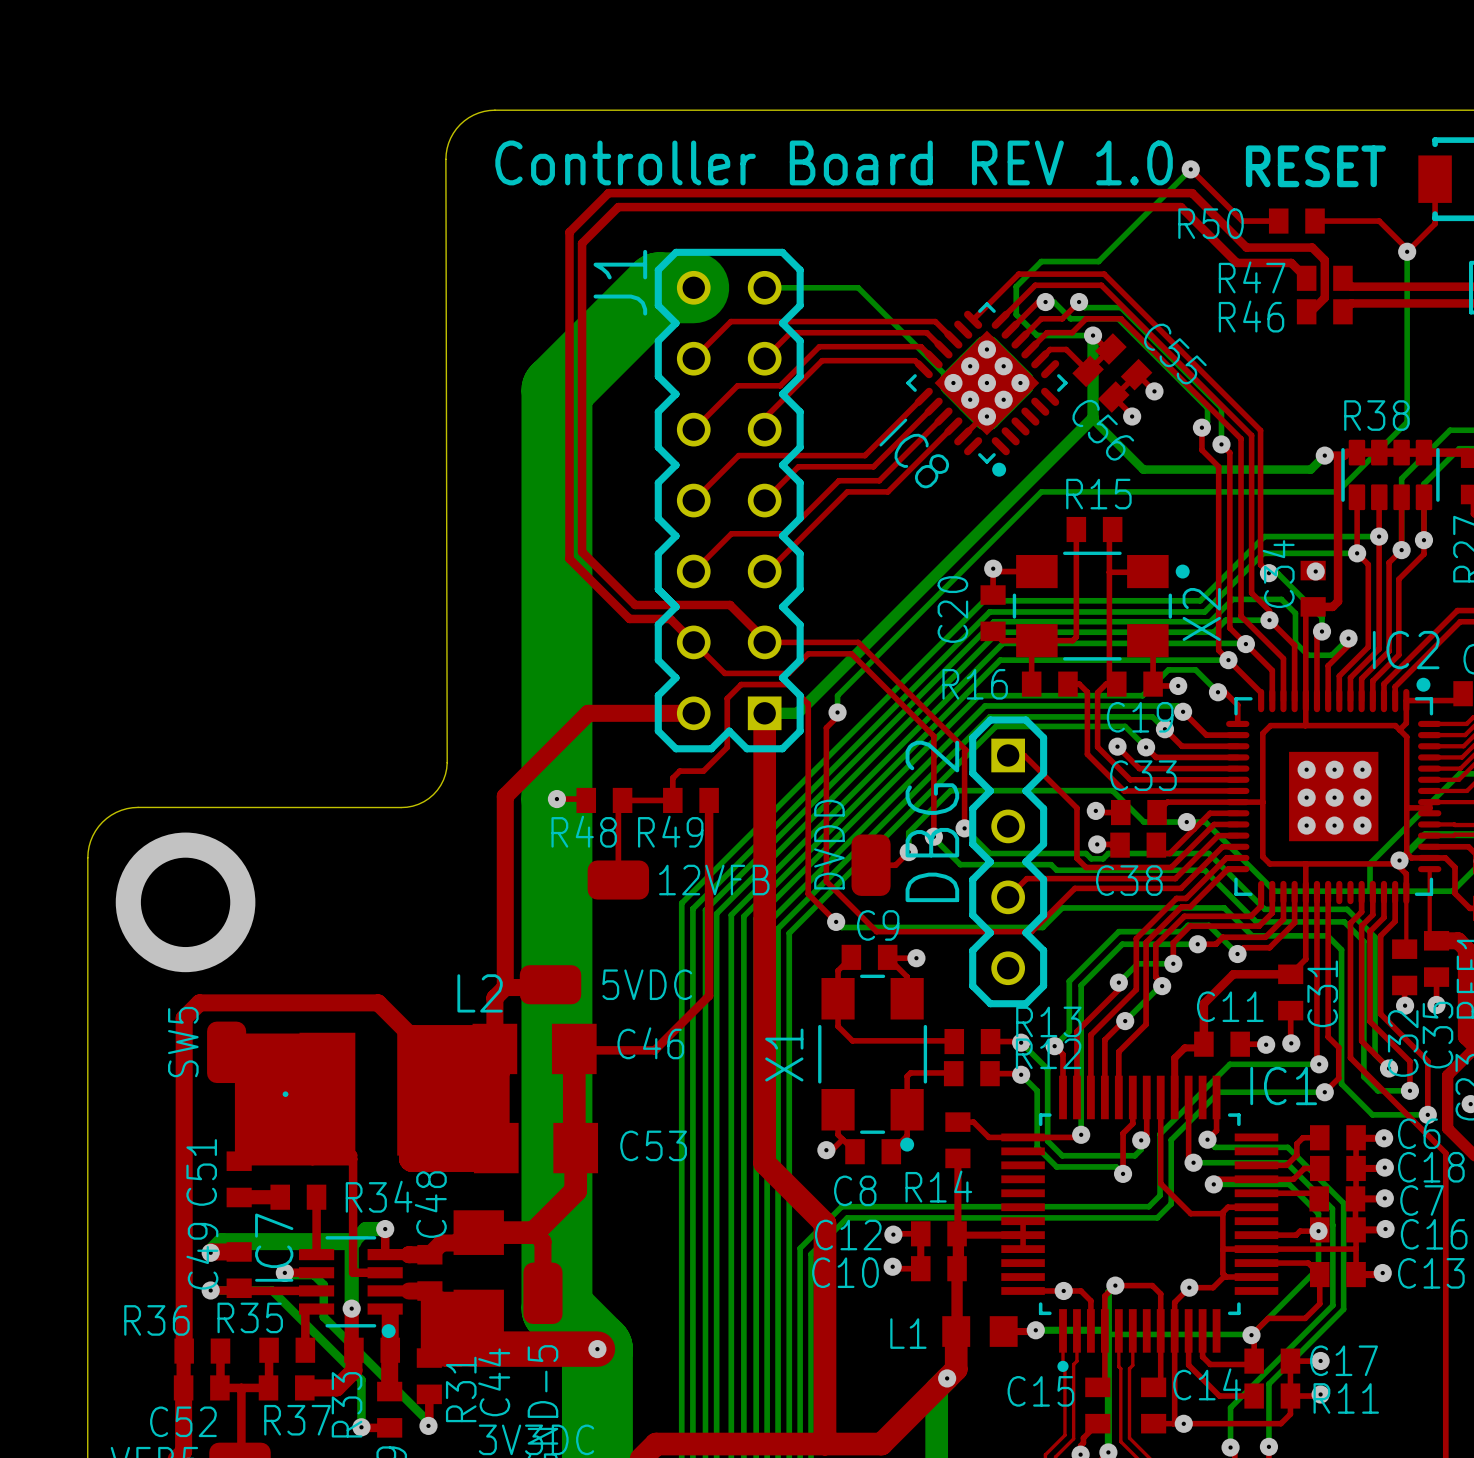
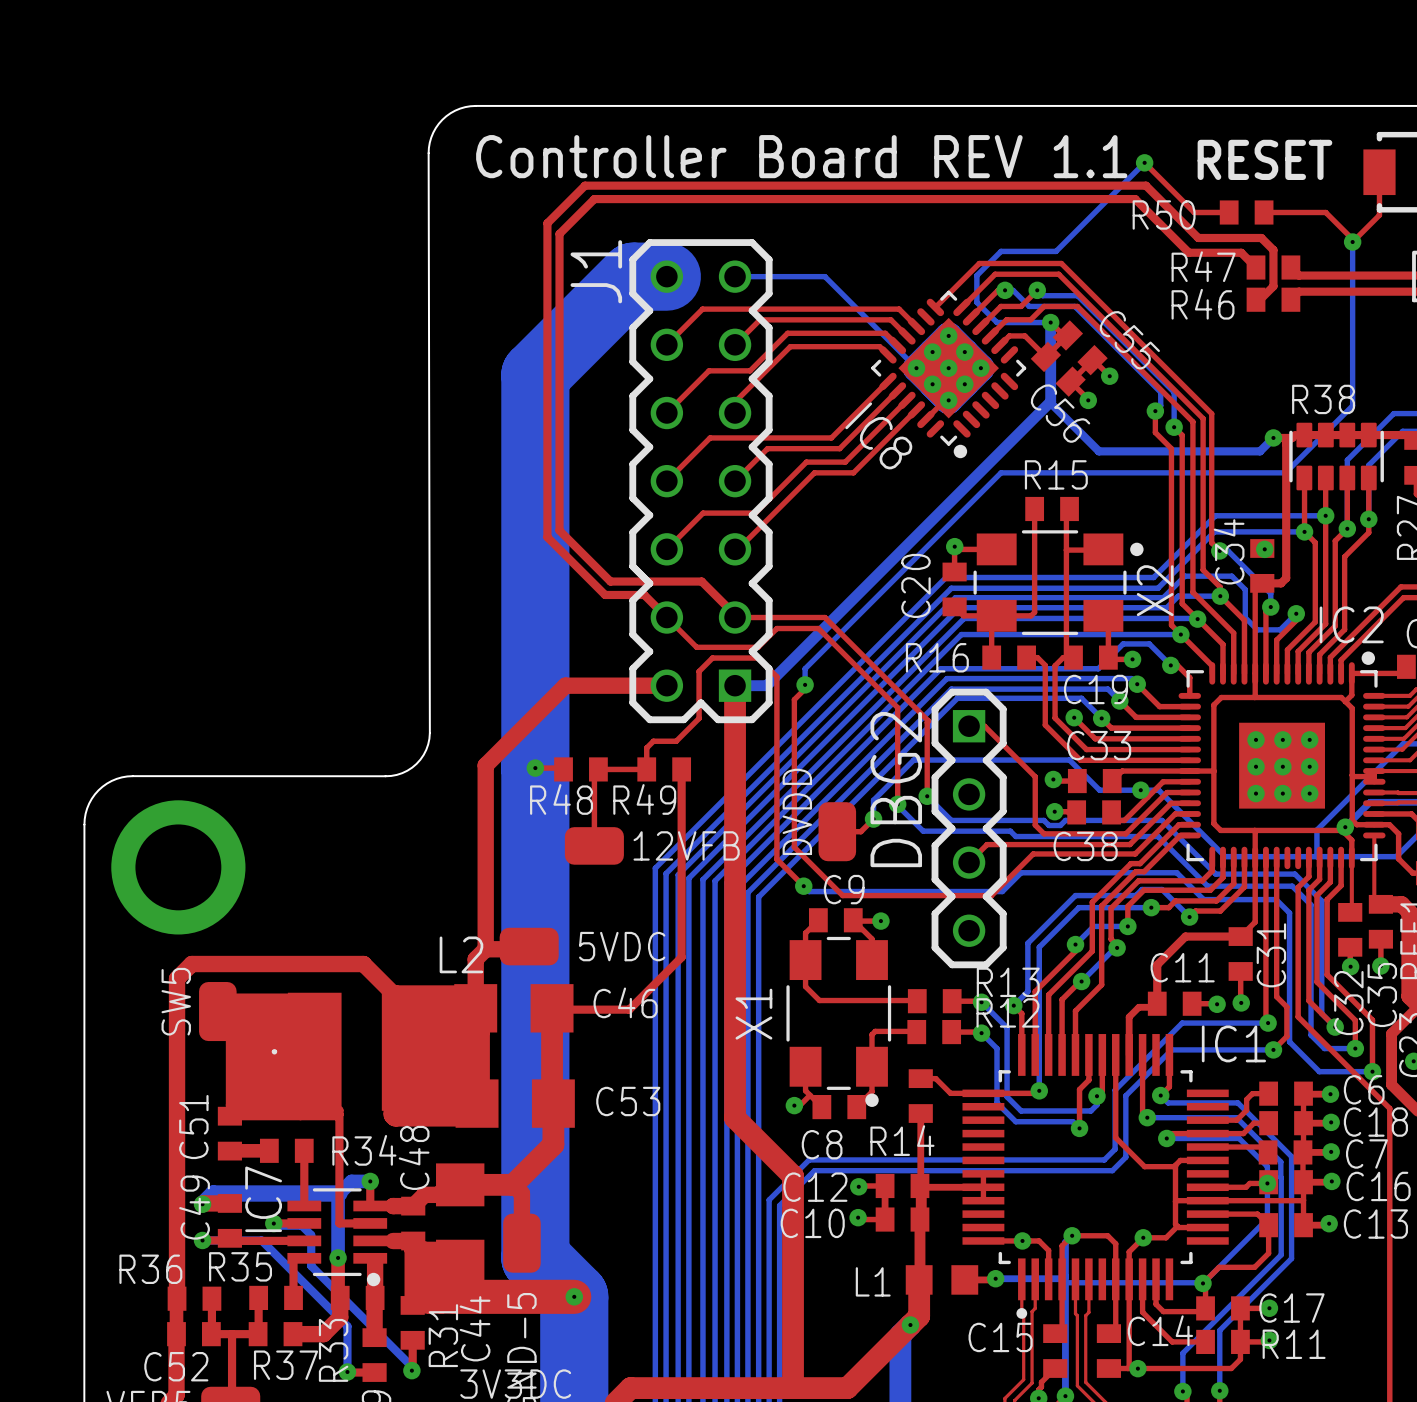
text: Controller Board REV 1.0 (834, 162) -> Controller Board REV 1.1 (801, 156)

